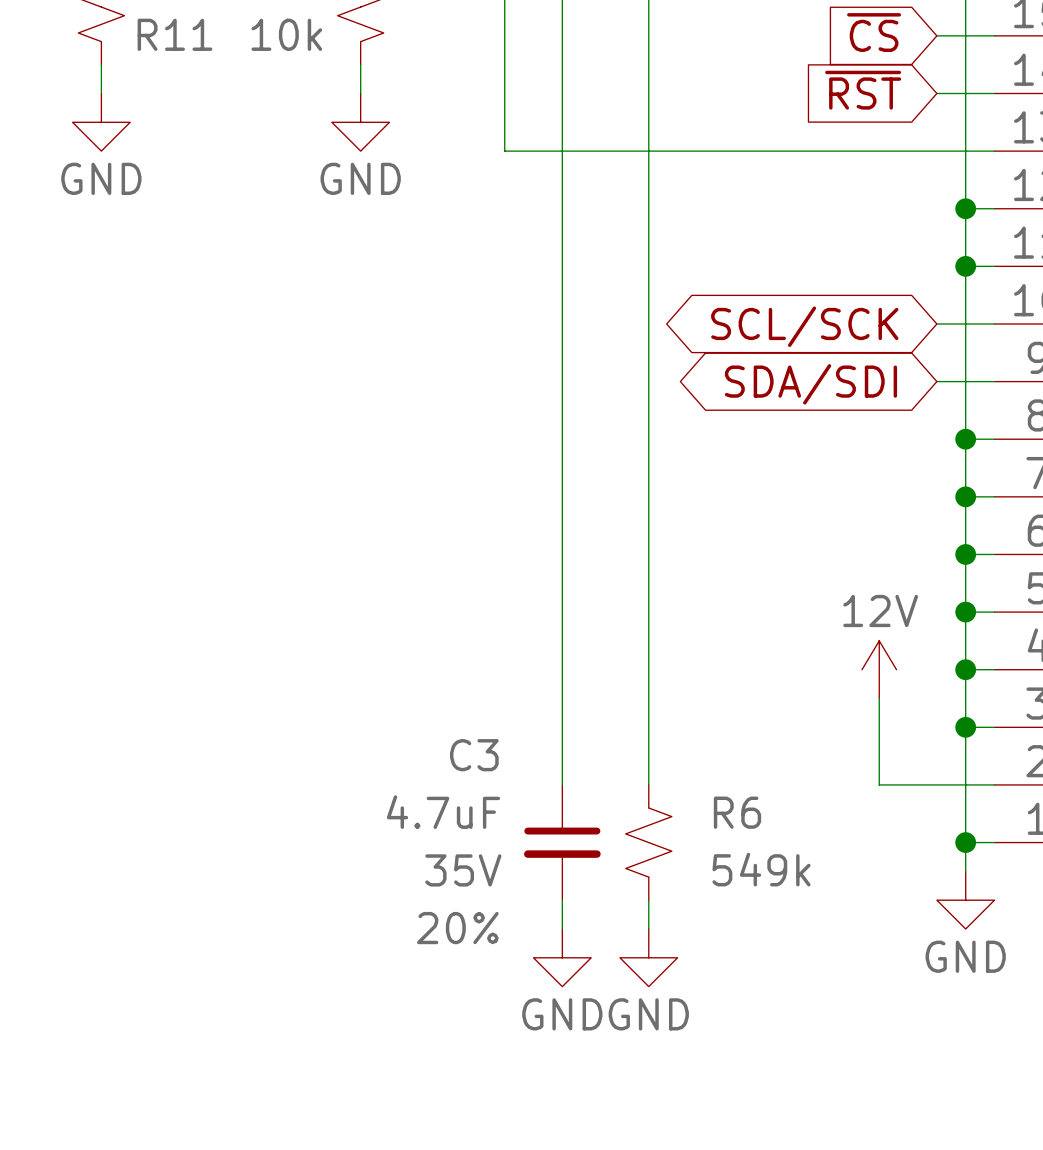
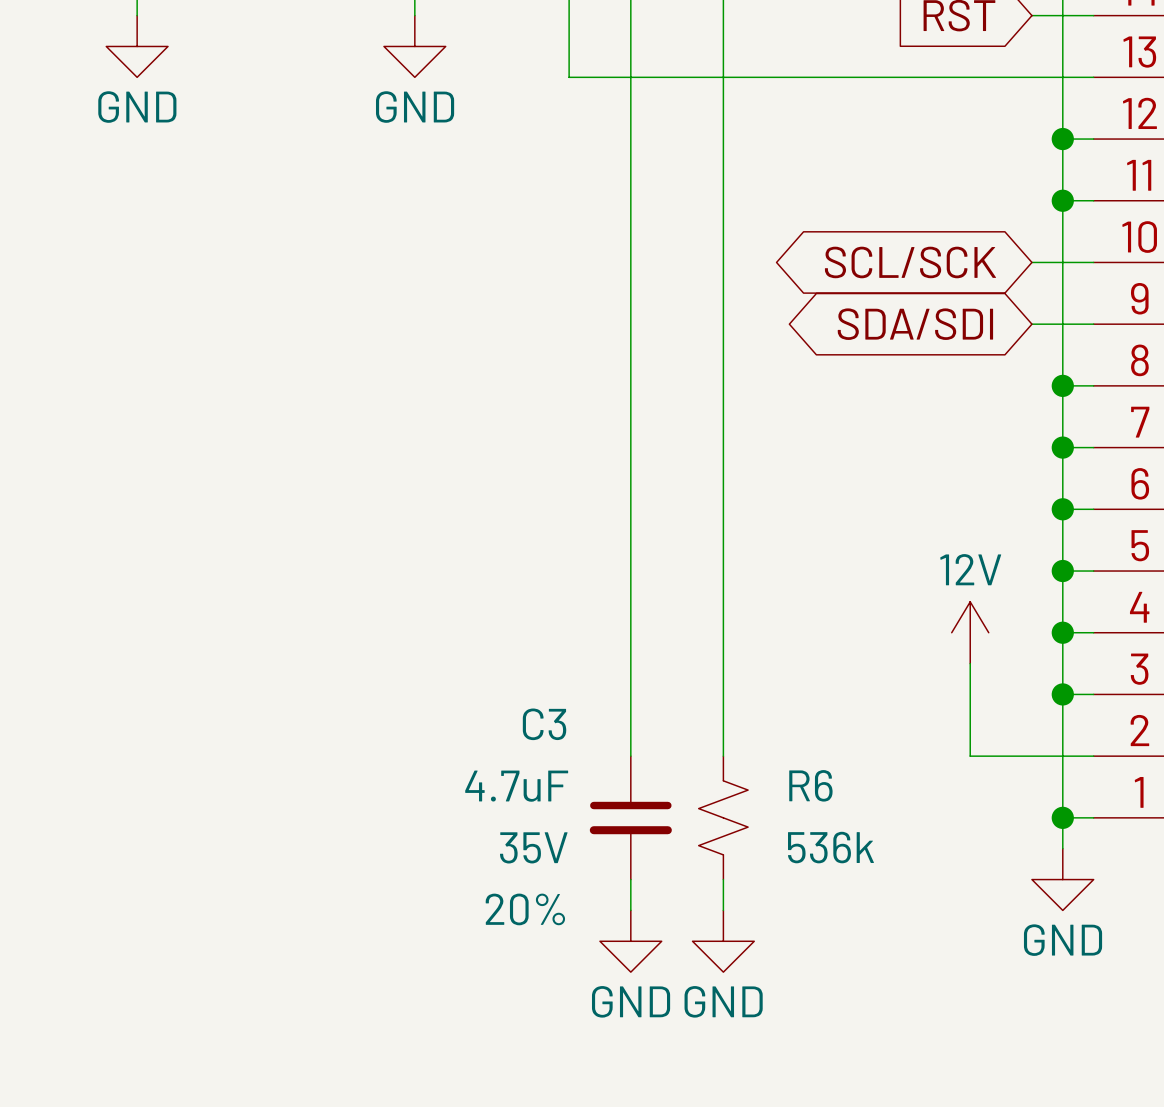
R6 value: 549k (761, 869) -> 536k (830, 847)

